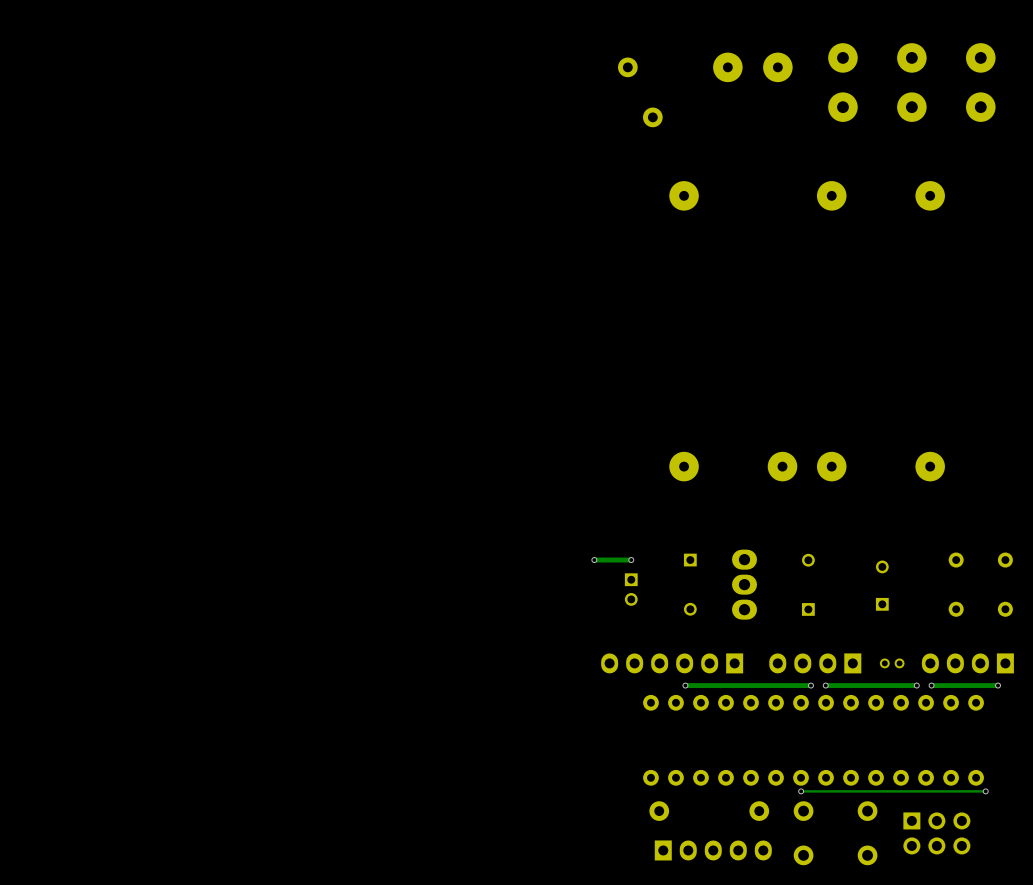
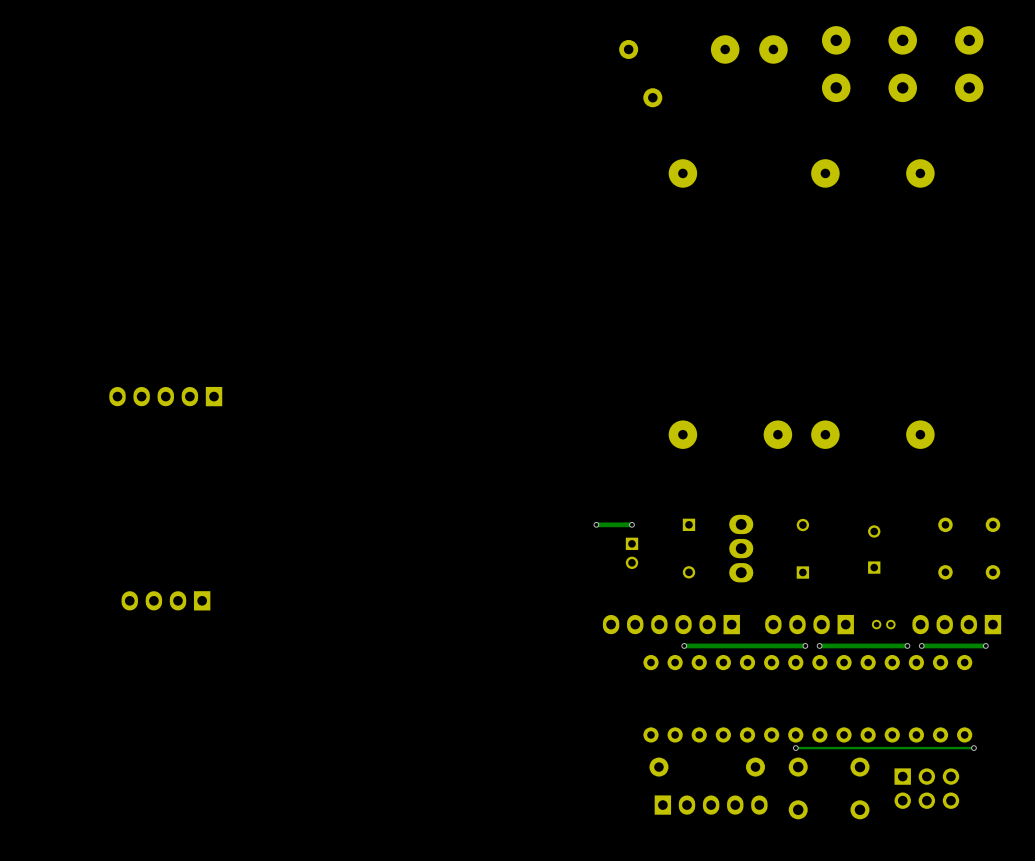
part: none -> (165, 396)
part: none -> (165, 600)

